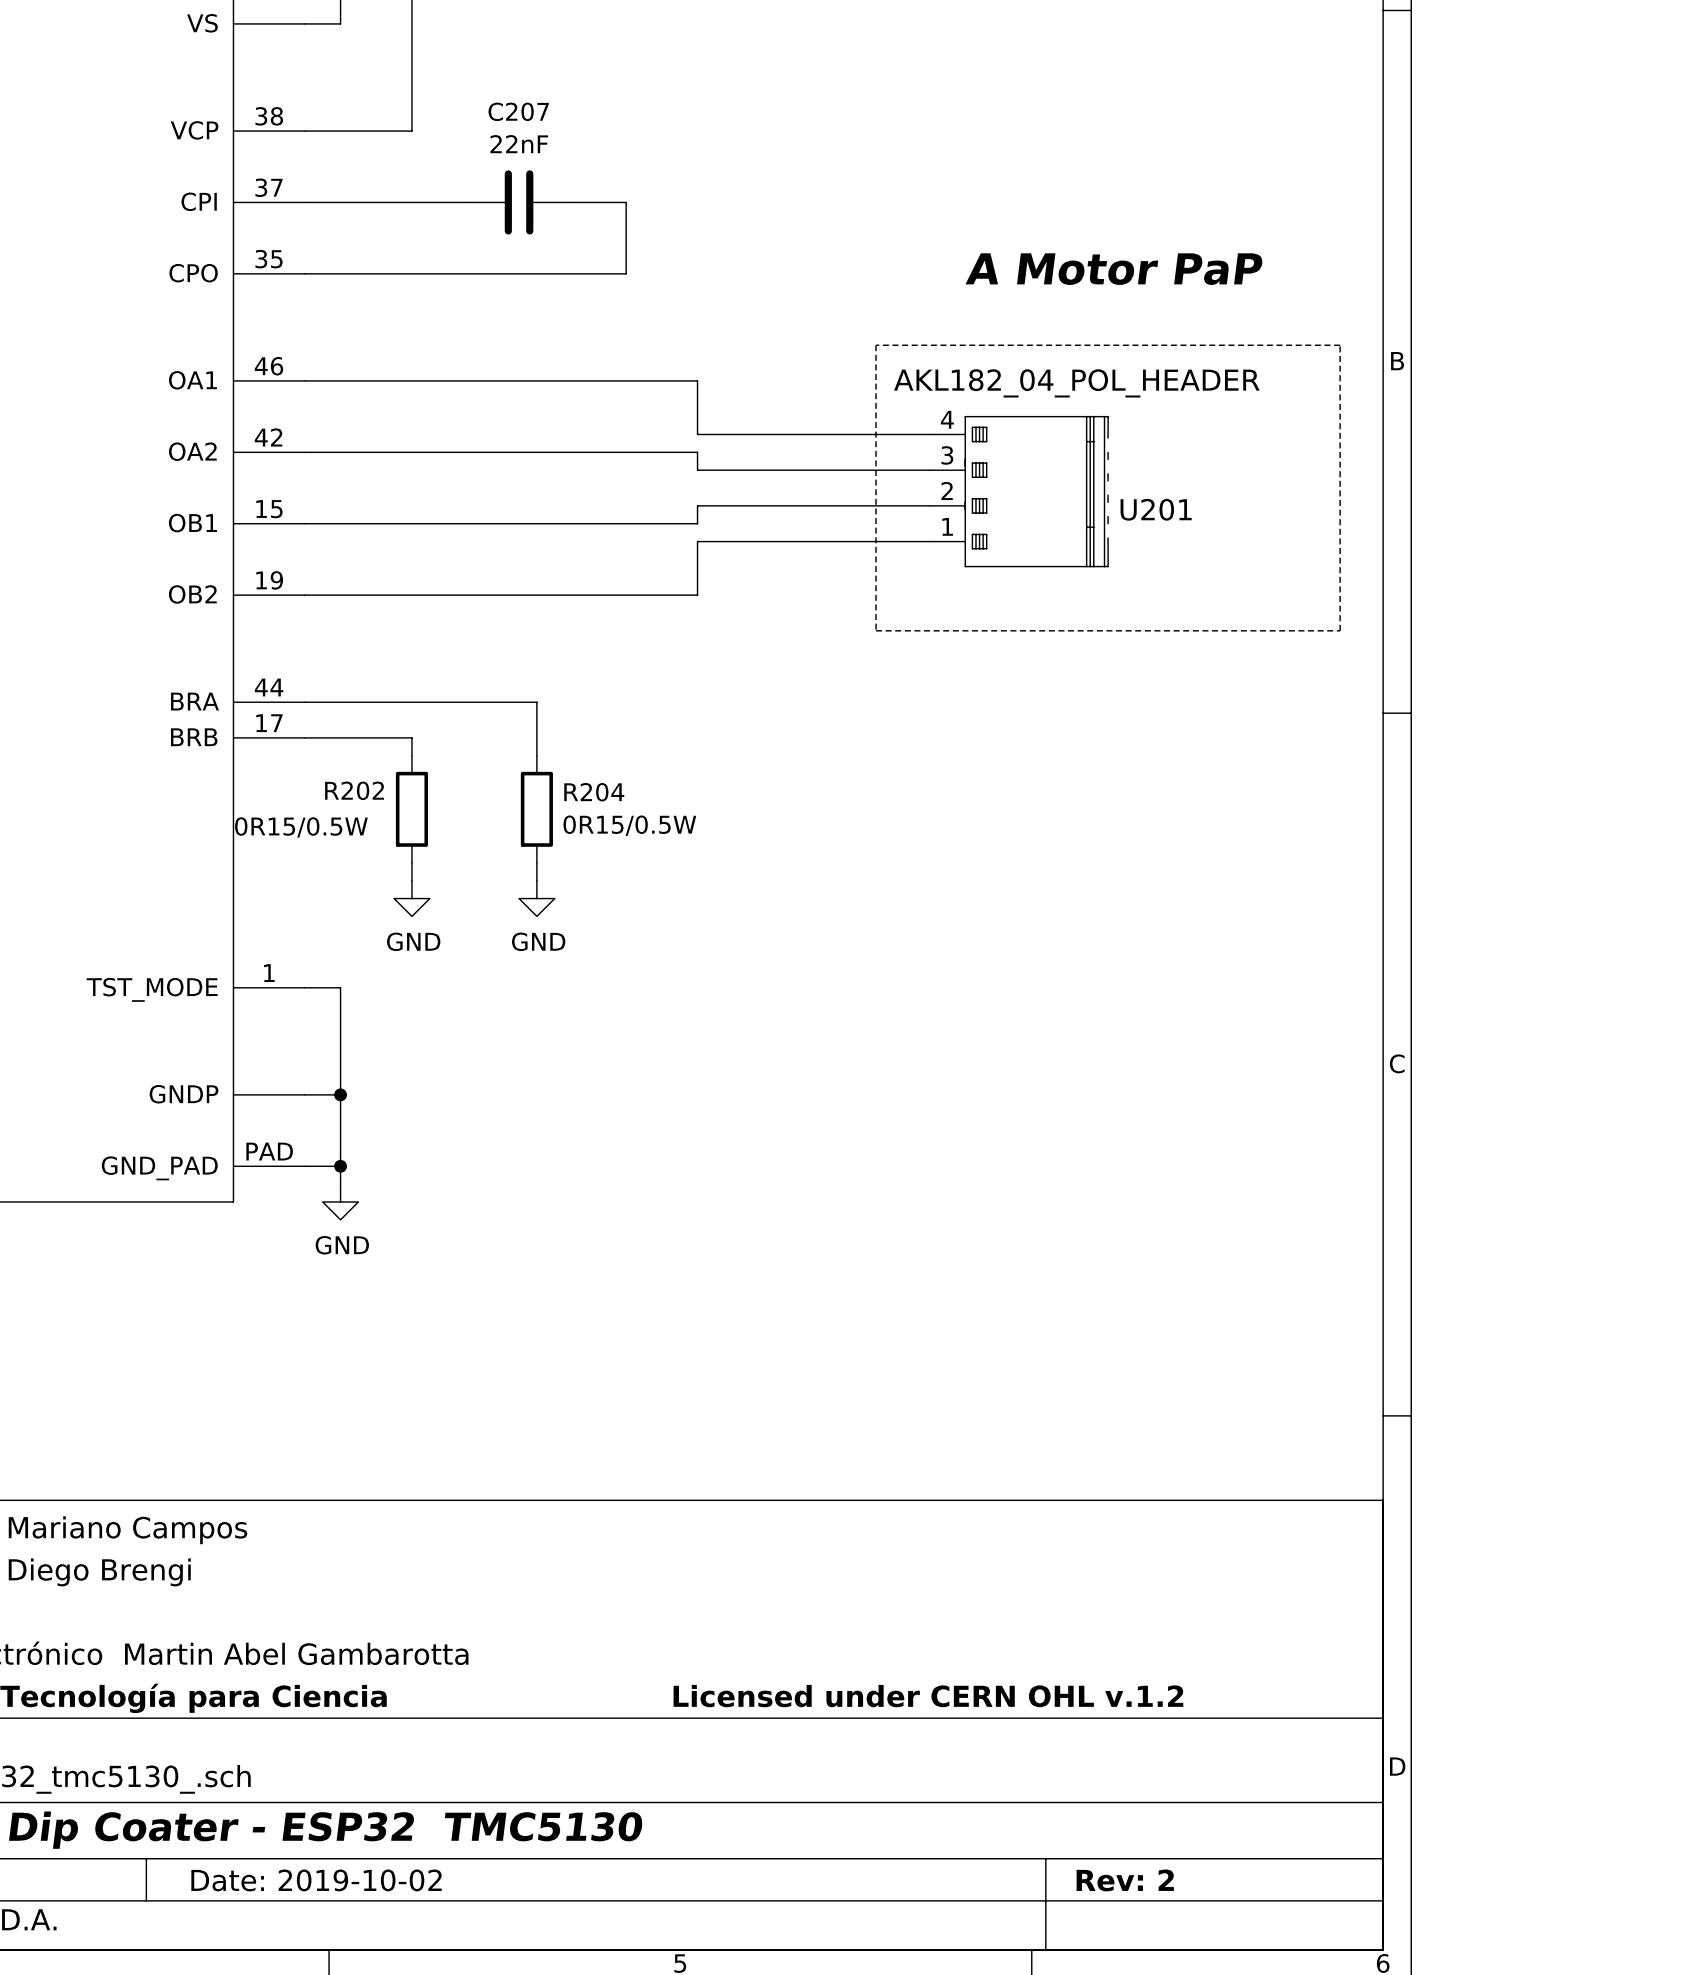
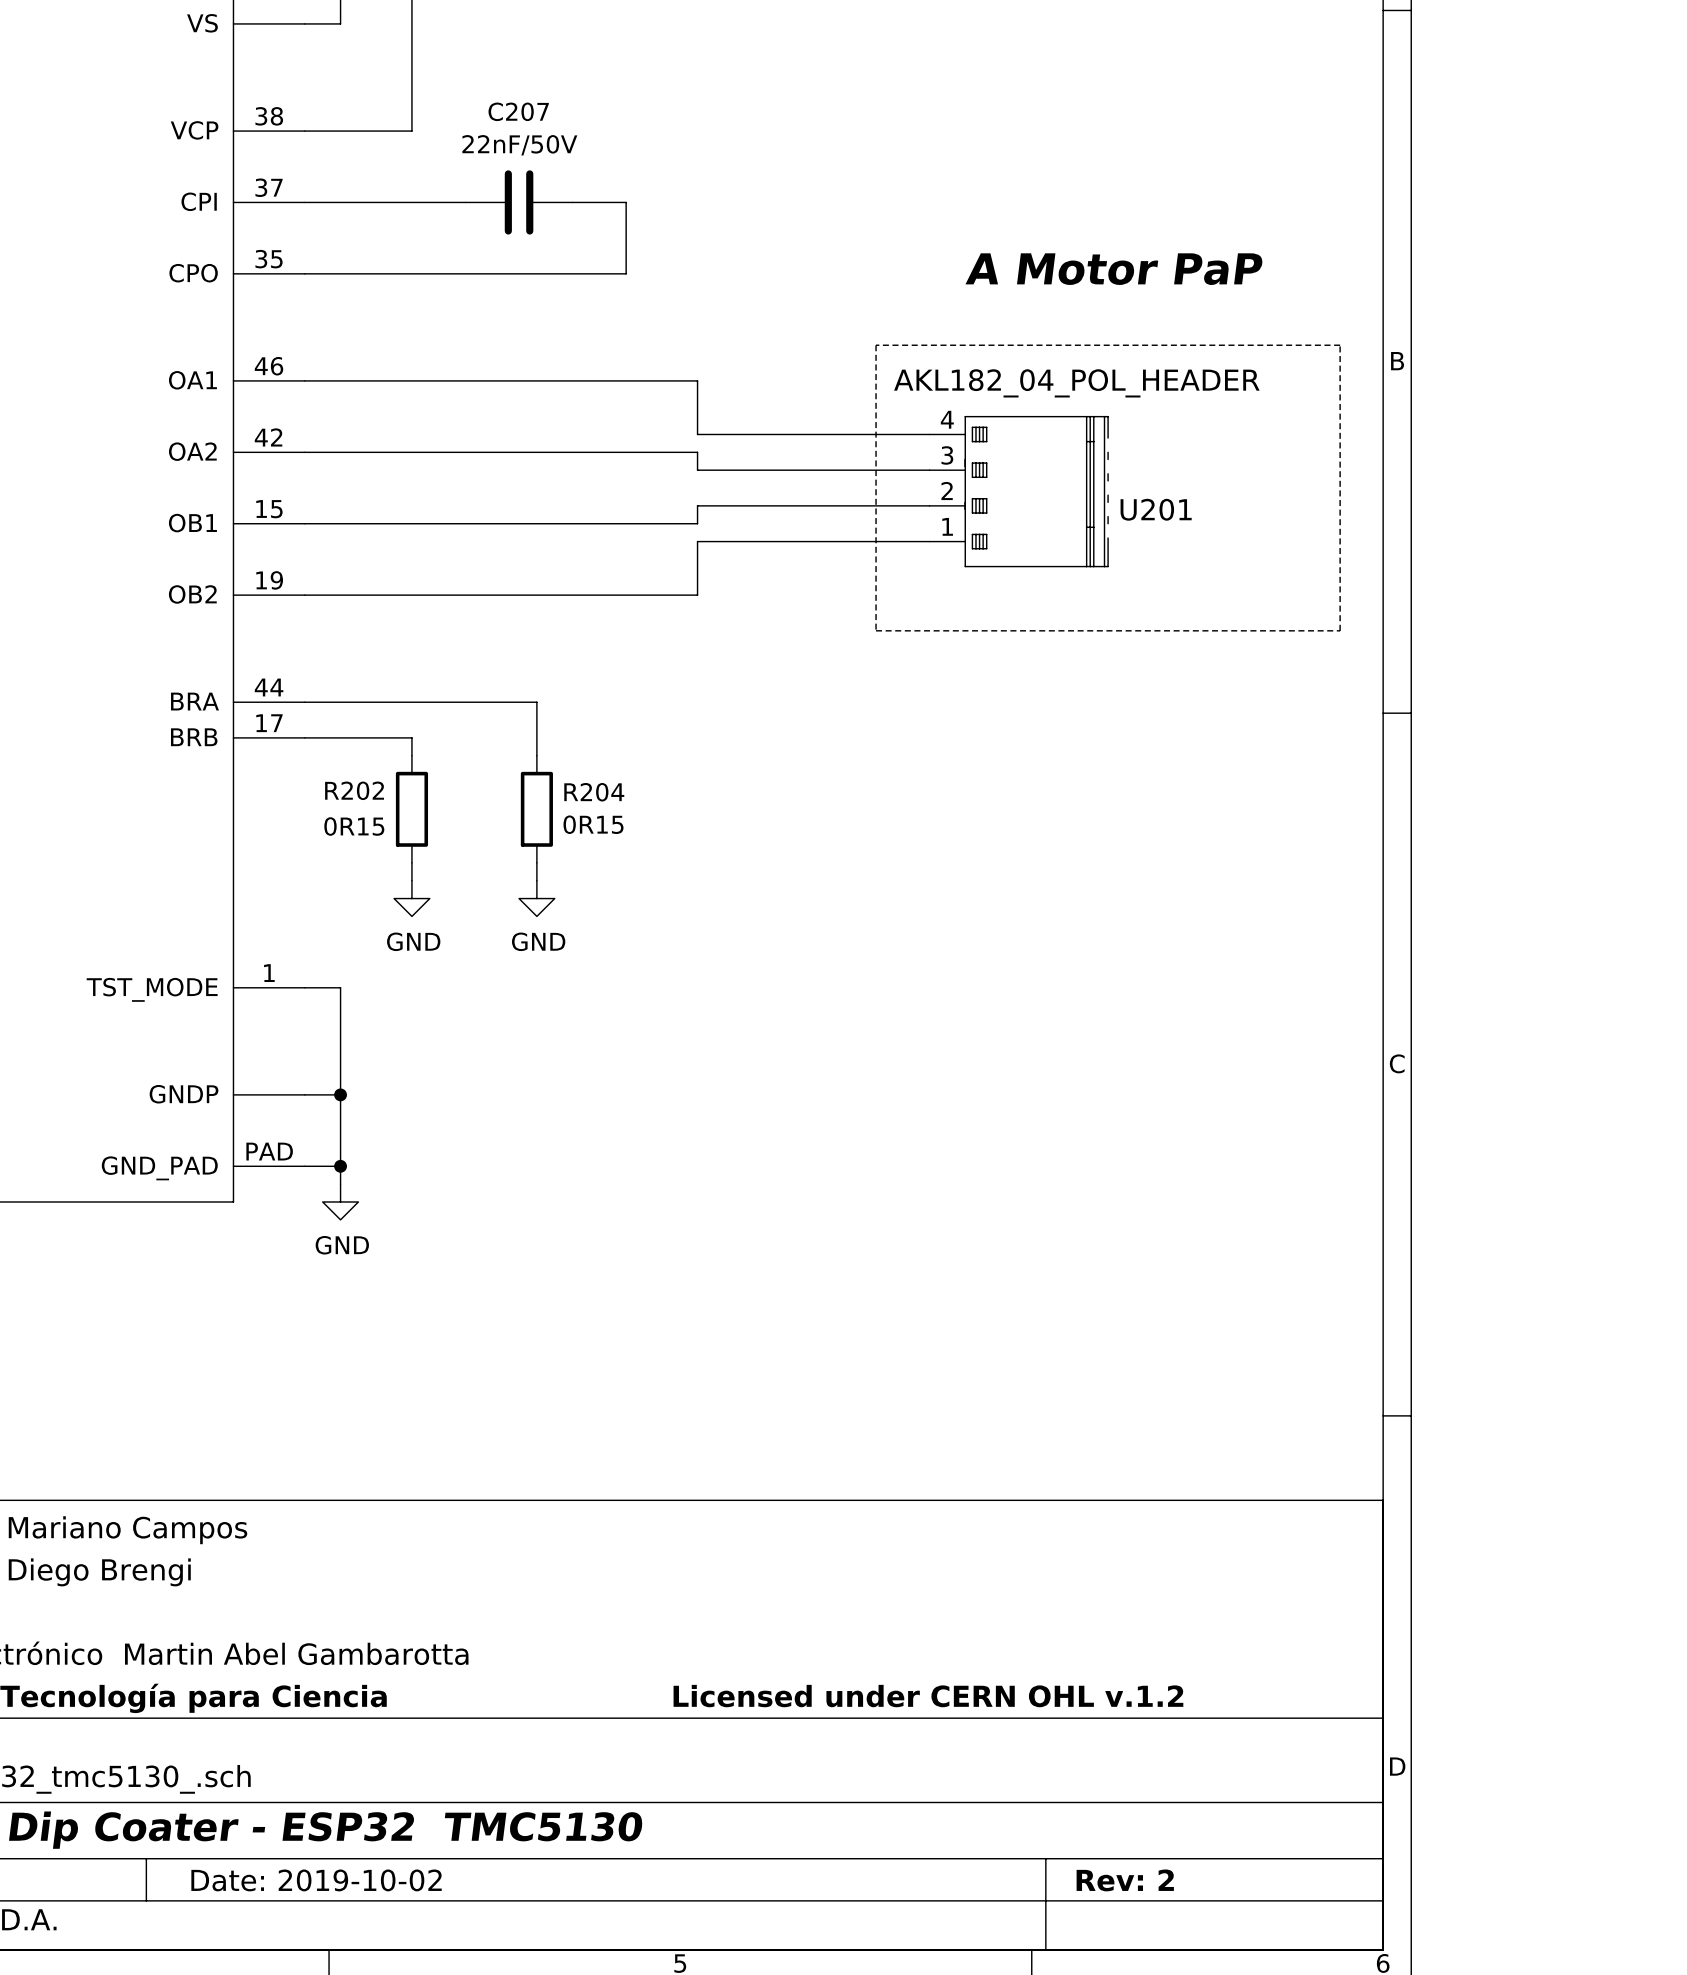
C207 value: 22nF (519, 144) -> 22nF/50V (519, 145)
R204 value: 0R15/0.5W (629, 825) -> 0R15 (593, 824)
R202 value: 0R15/0.5W (301, 827) -> 0R15 (354, 826)

